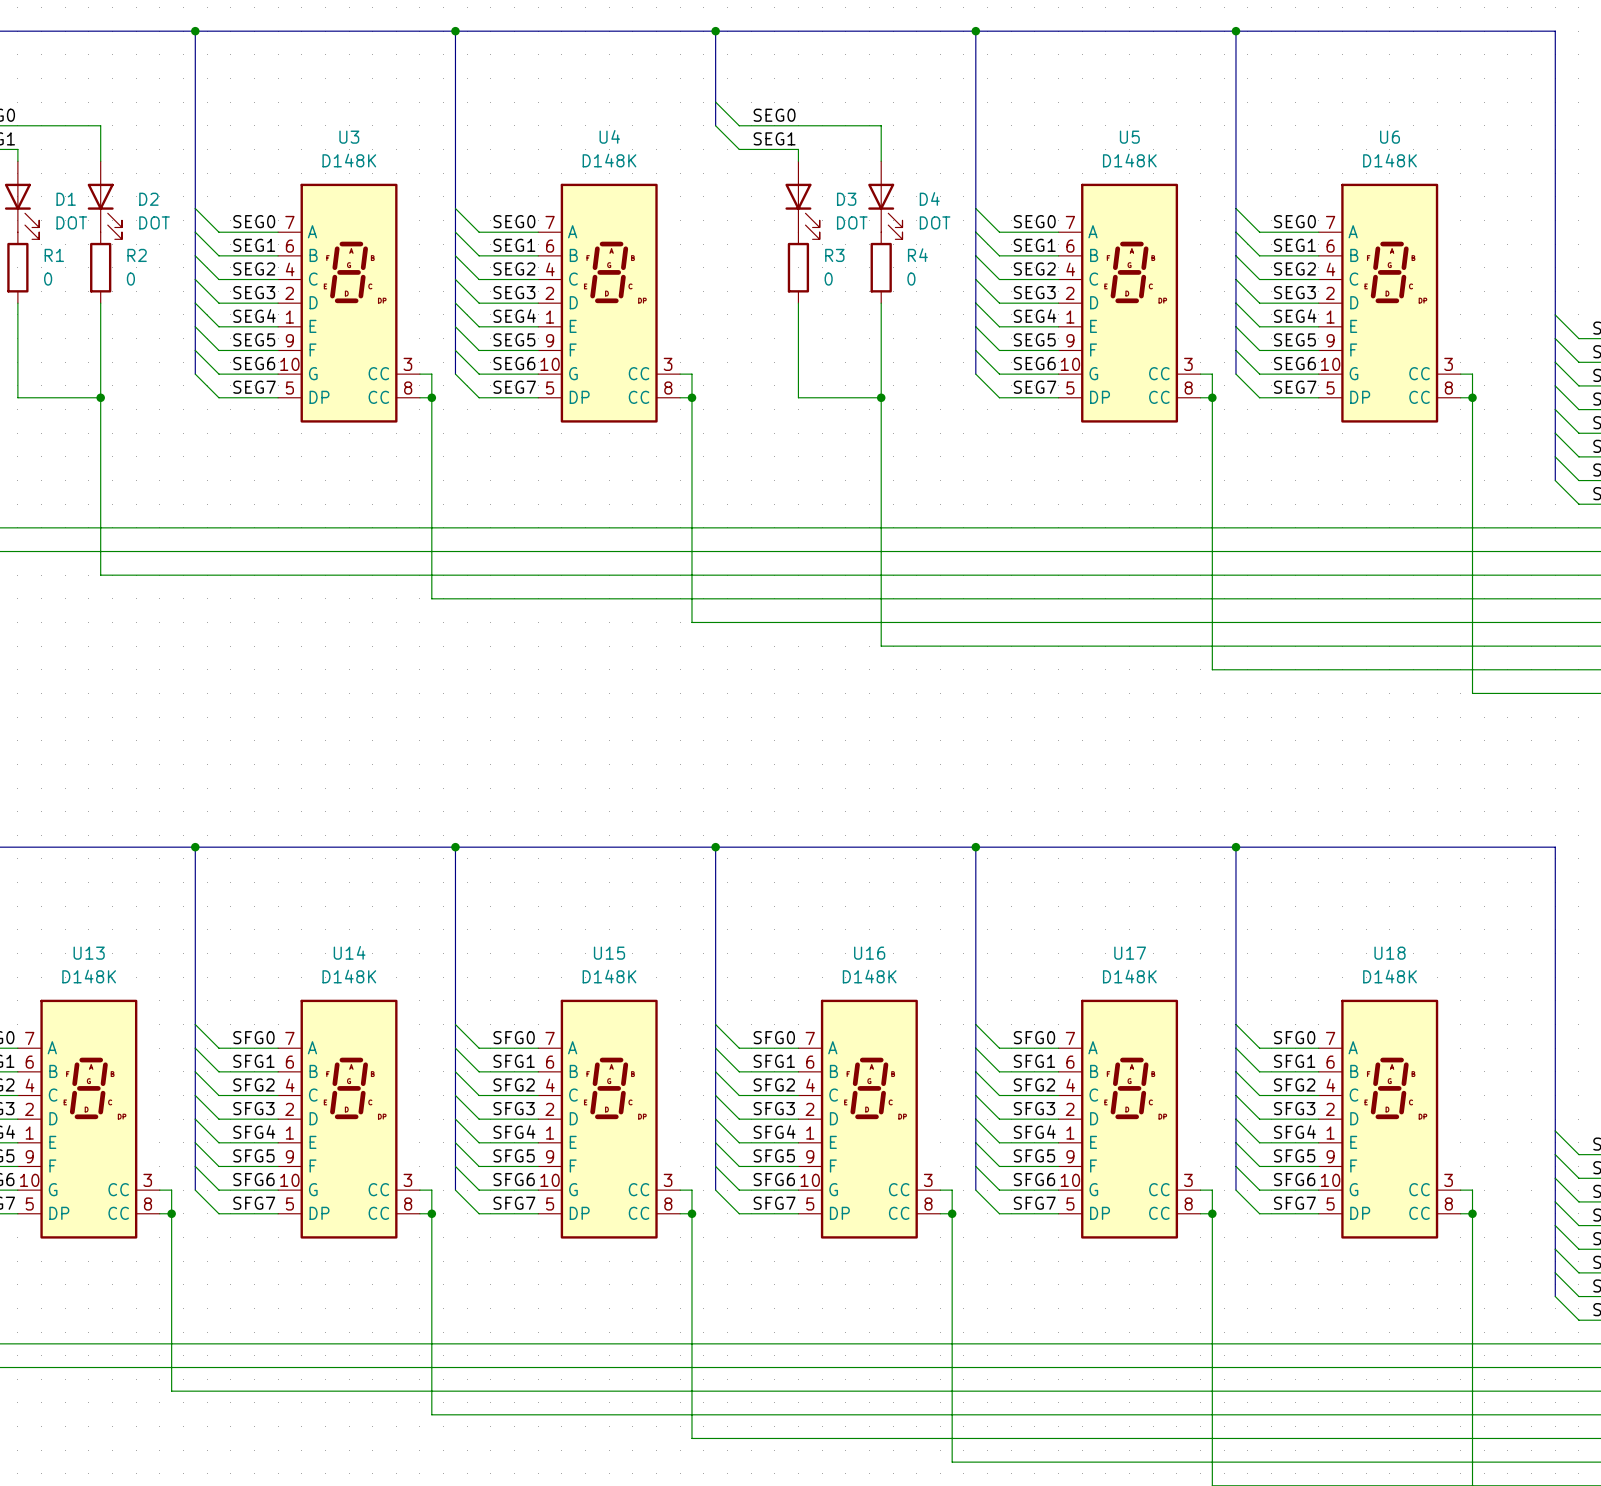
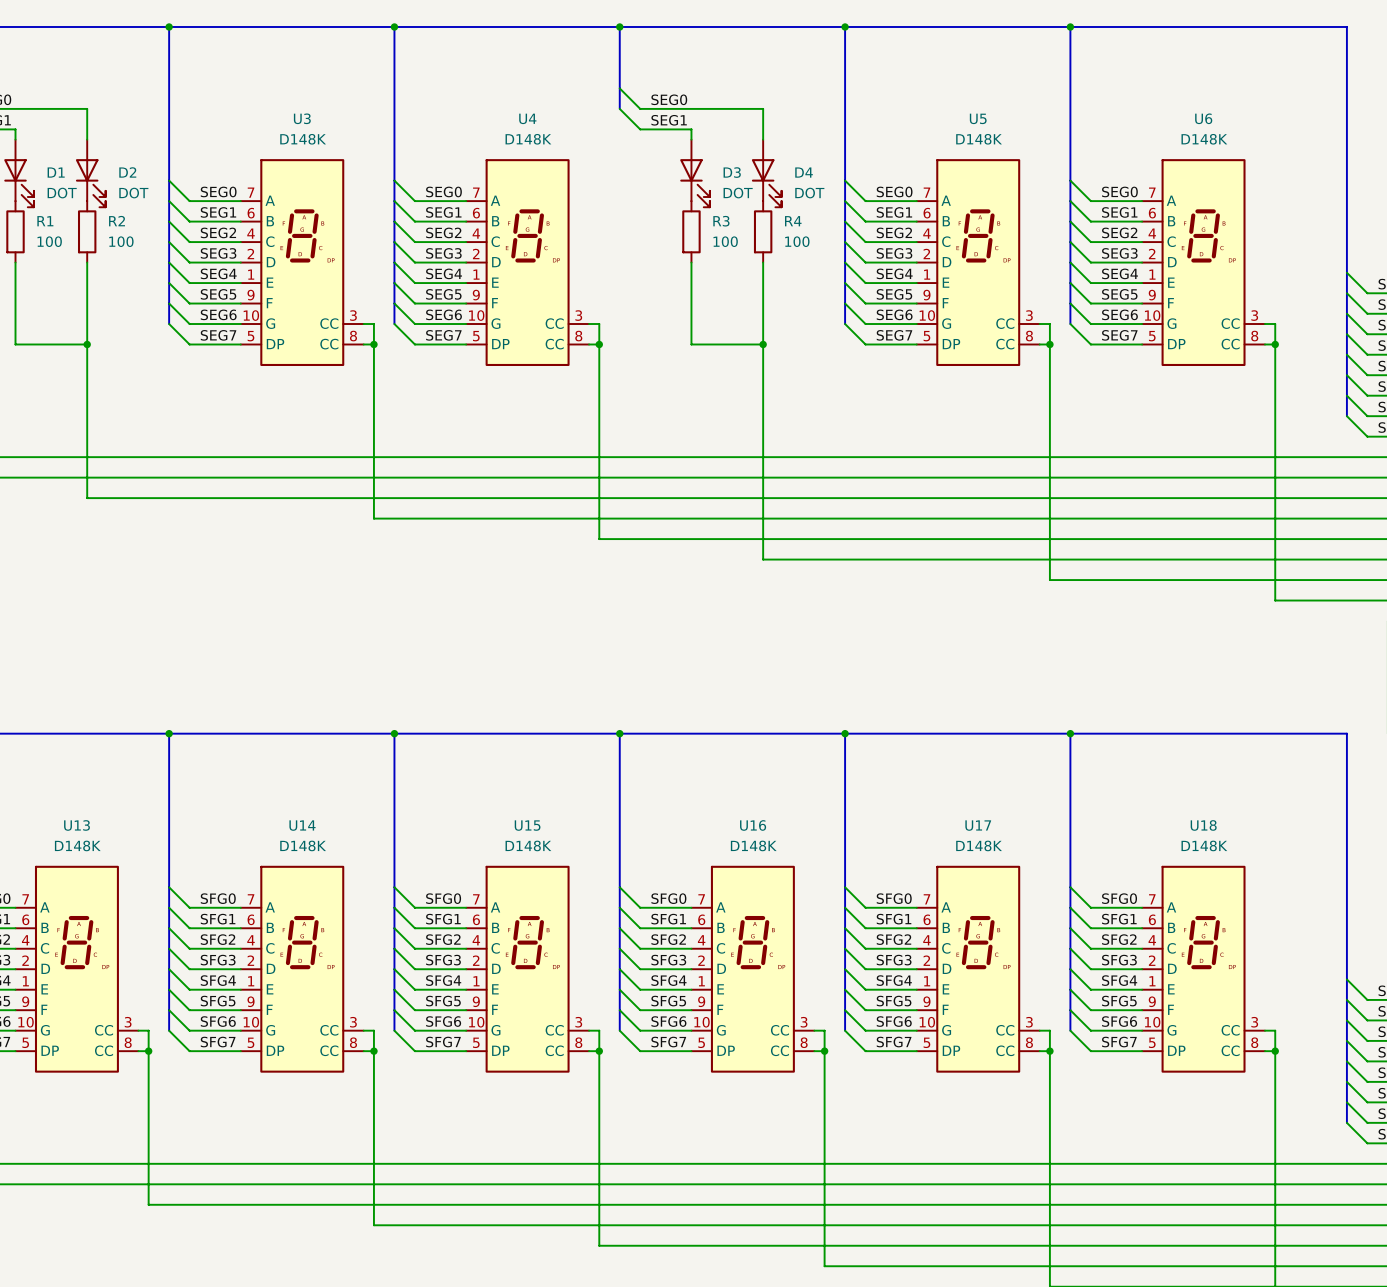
R1 value: 0 (48, 279) -> 100 (49, 241)
R2 value: 0 (130, 279) -> 100 (121, 241)
R3 value: 0 (828, 279) -> 100 (725, 241)
R4 value: 0 (911, 279) -> 100 (797, 241)

